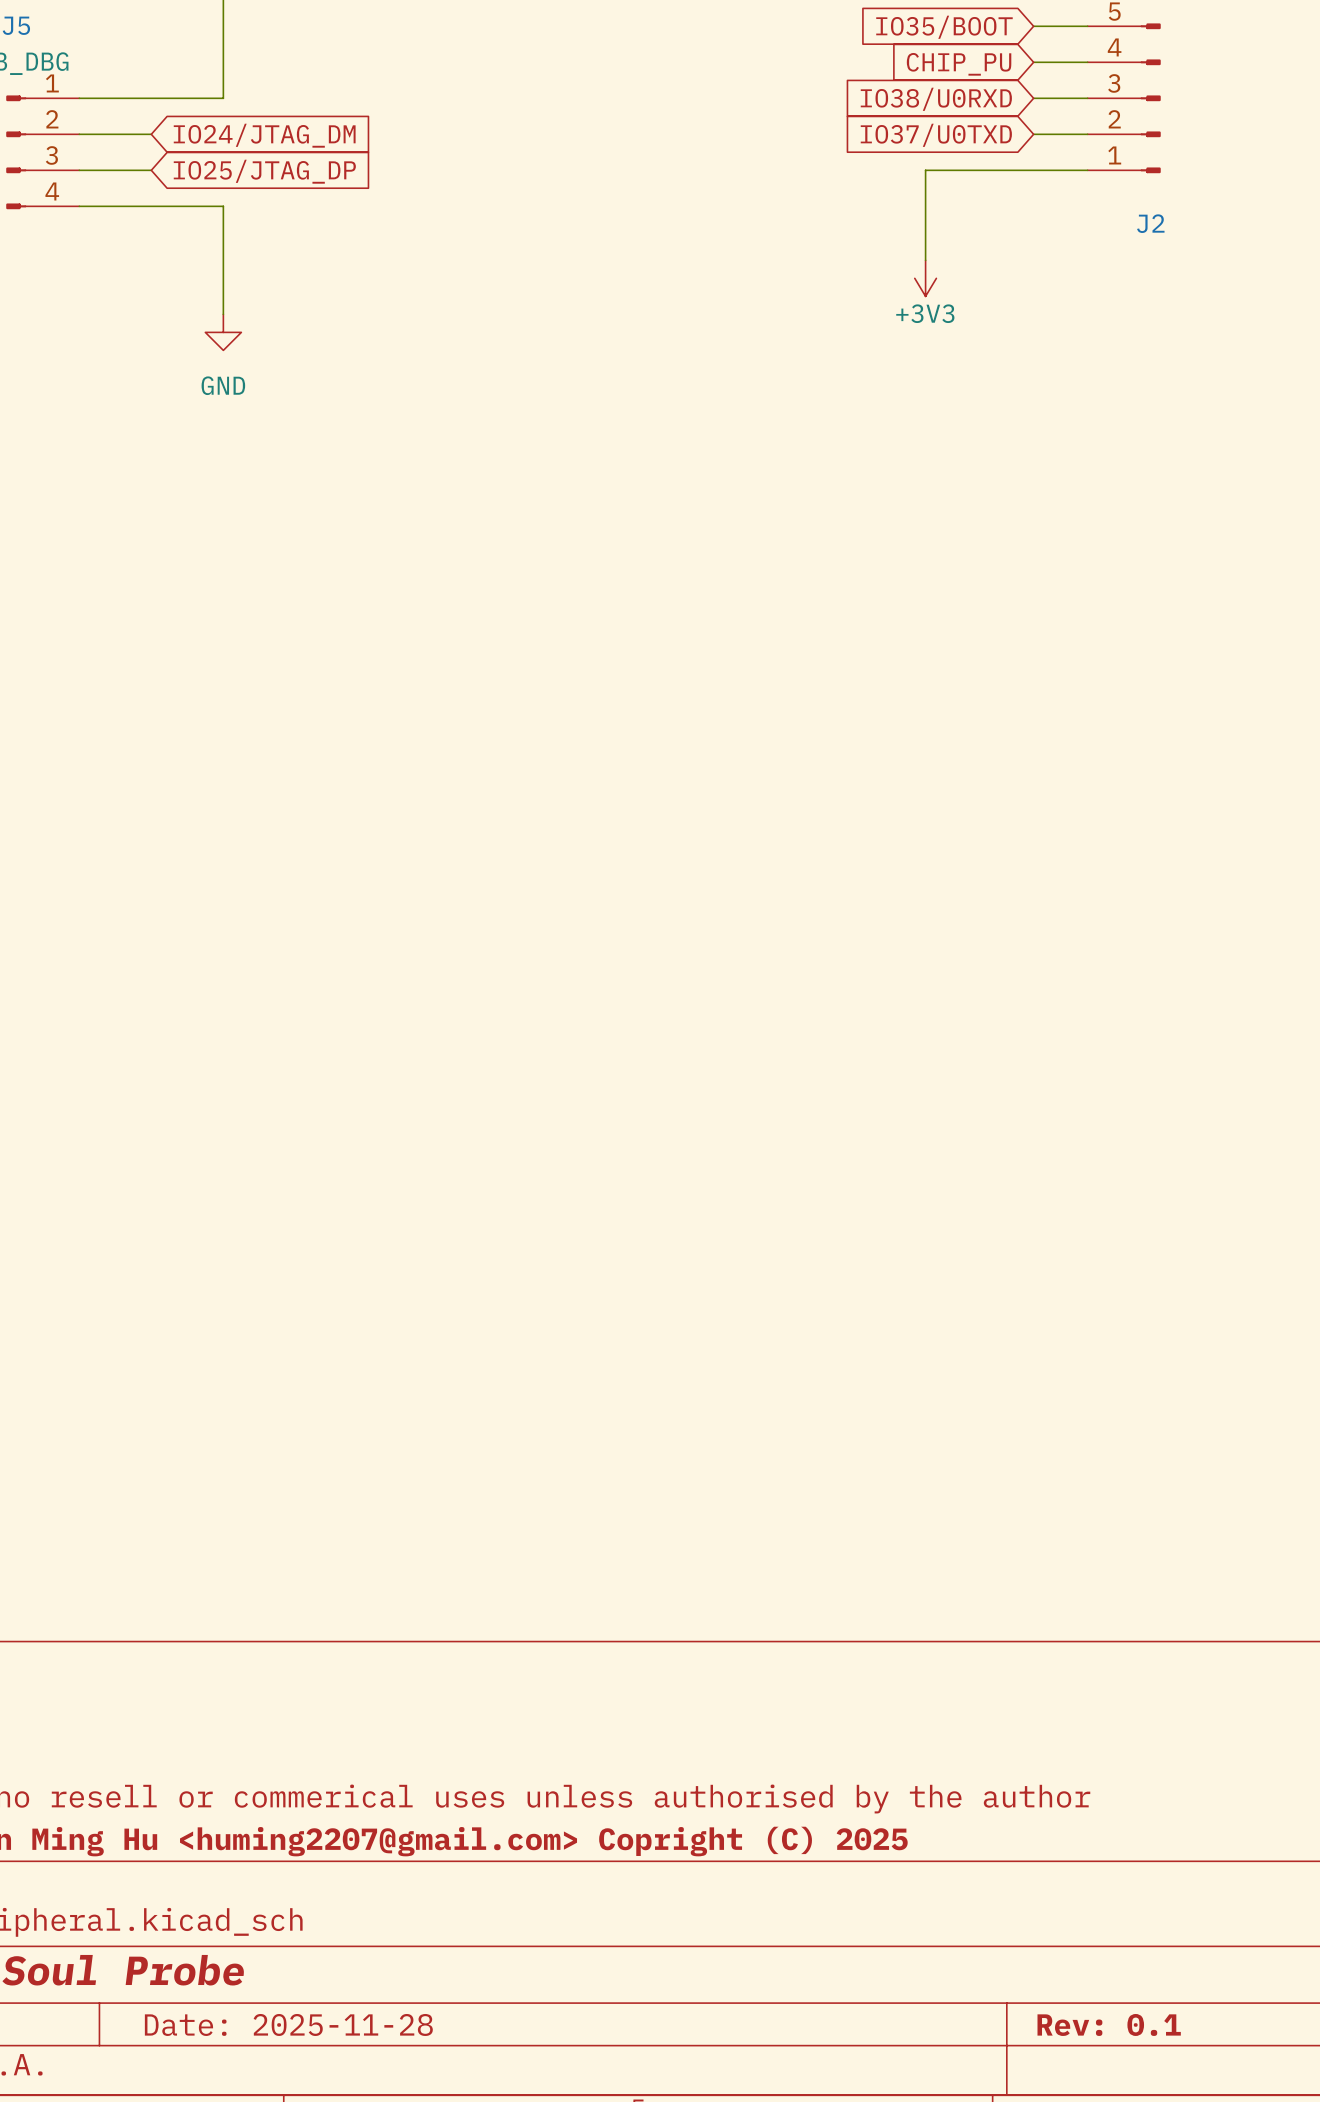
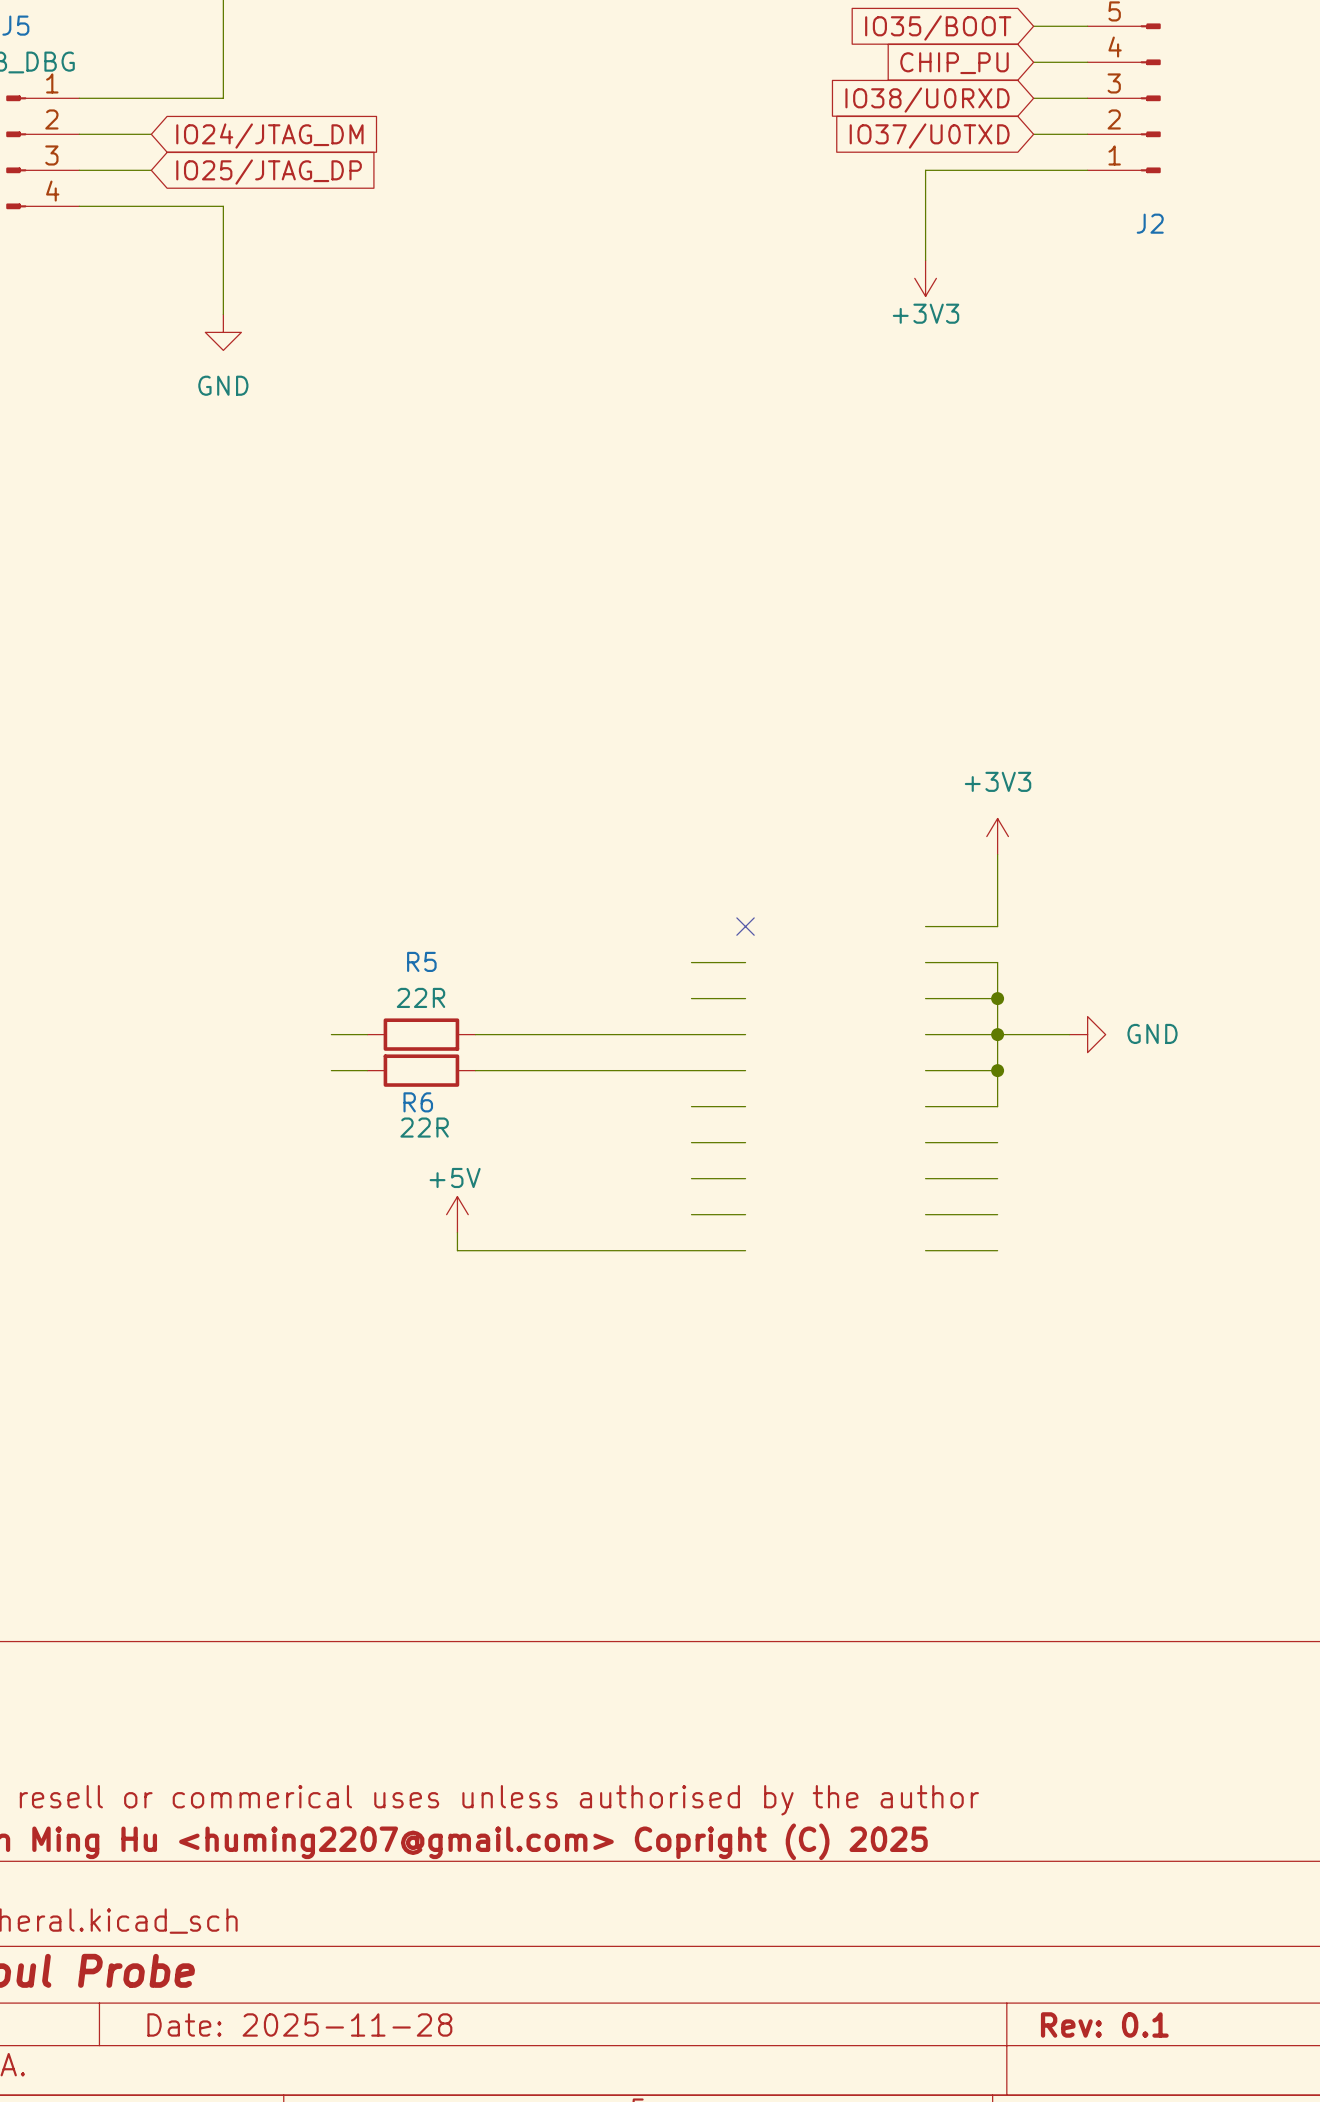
power symbol: none -> +3V3 (997, 836)
wire: none -> (997, 854) (997, 926) (925, 926)
no-connect mark: none -> (745, 926)
wire: none -> (691, 962) (745, 962)
wire: none -> (925, 962) (997, 962) (997, 1106) (925, 1106)
wire: none -> (691, 998) (745, 998)
wire: none -> (925, 998) (997, 998)
junction: none -> (997, 998)
wire: none -> (331, 1034) (367, 1034)
R5: none -> 22R (421, 1034)
wire: none -> (475, 1034) (745, 1034)
wire: none -> (925, 1034) (1069, 1034)
junction: none -> (997, 1034)
power symbol: none -> GND (1087, 1034)
wire: none -> (331, 1070) (367, 1070)
R6: none -> 22R (421, 1070)
wire: none -> (475, 1070) (745, 1070)
wire: none -> (925, 1070) (997, 1070)
junction: none -> (997, 1070)
wire: none -> (691, 1106) (745, 1106)
wire: none -> (691, 1142) (745, 1142)
wire: none -> (925, 1142) (997, 1142)
wire: none -> (691, 1178) (745, 1178)
wire: none -> (925, 1178) (997, 1178)
power symbol: none -> +5V (457, 1214)
wire: none -> (691, 1214) (745, 1214)
wire: none -> (925, 1214) (997, 1214)
wire: none -> (457, 1232) (457, 1250) (745, 1250)
wire: none -> (925, 1250) (997, 1250)

